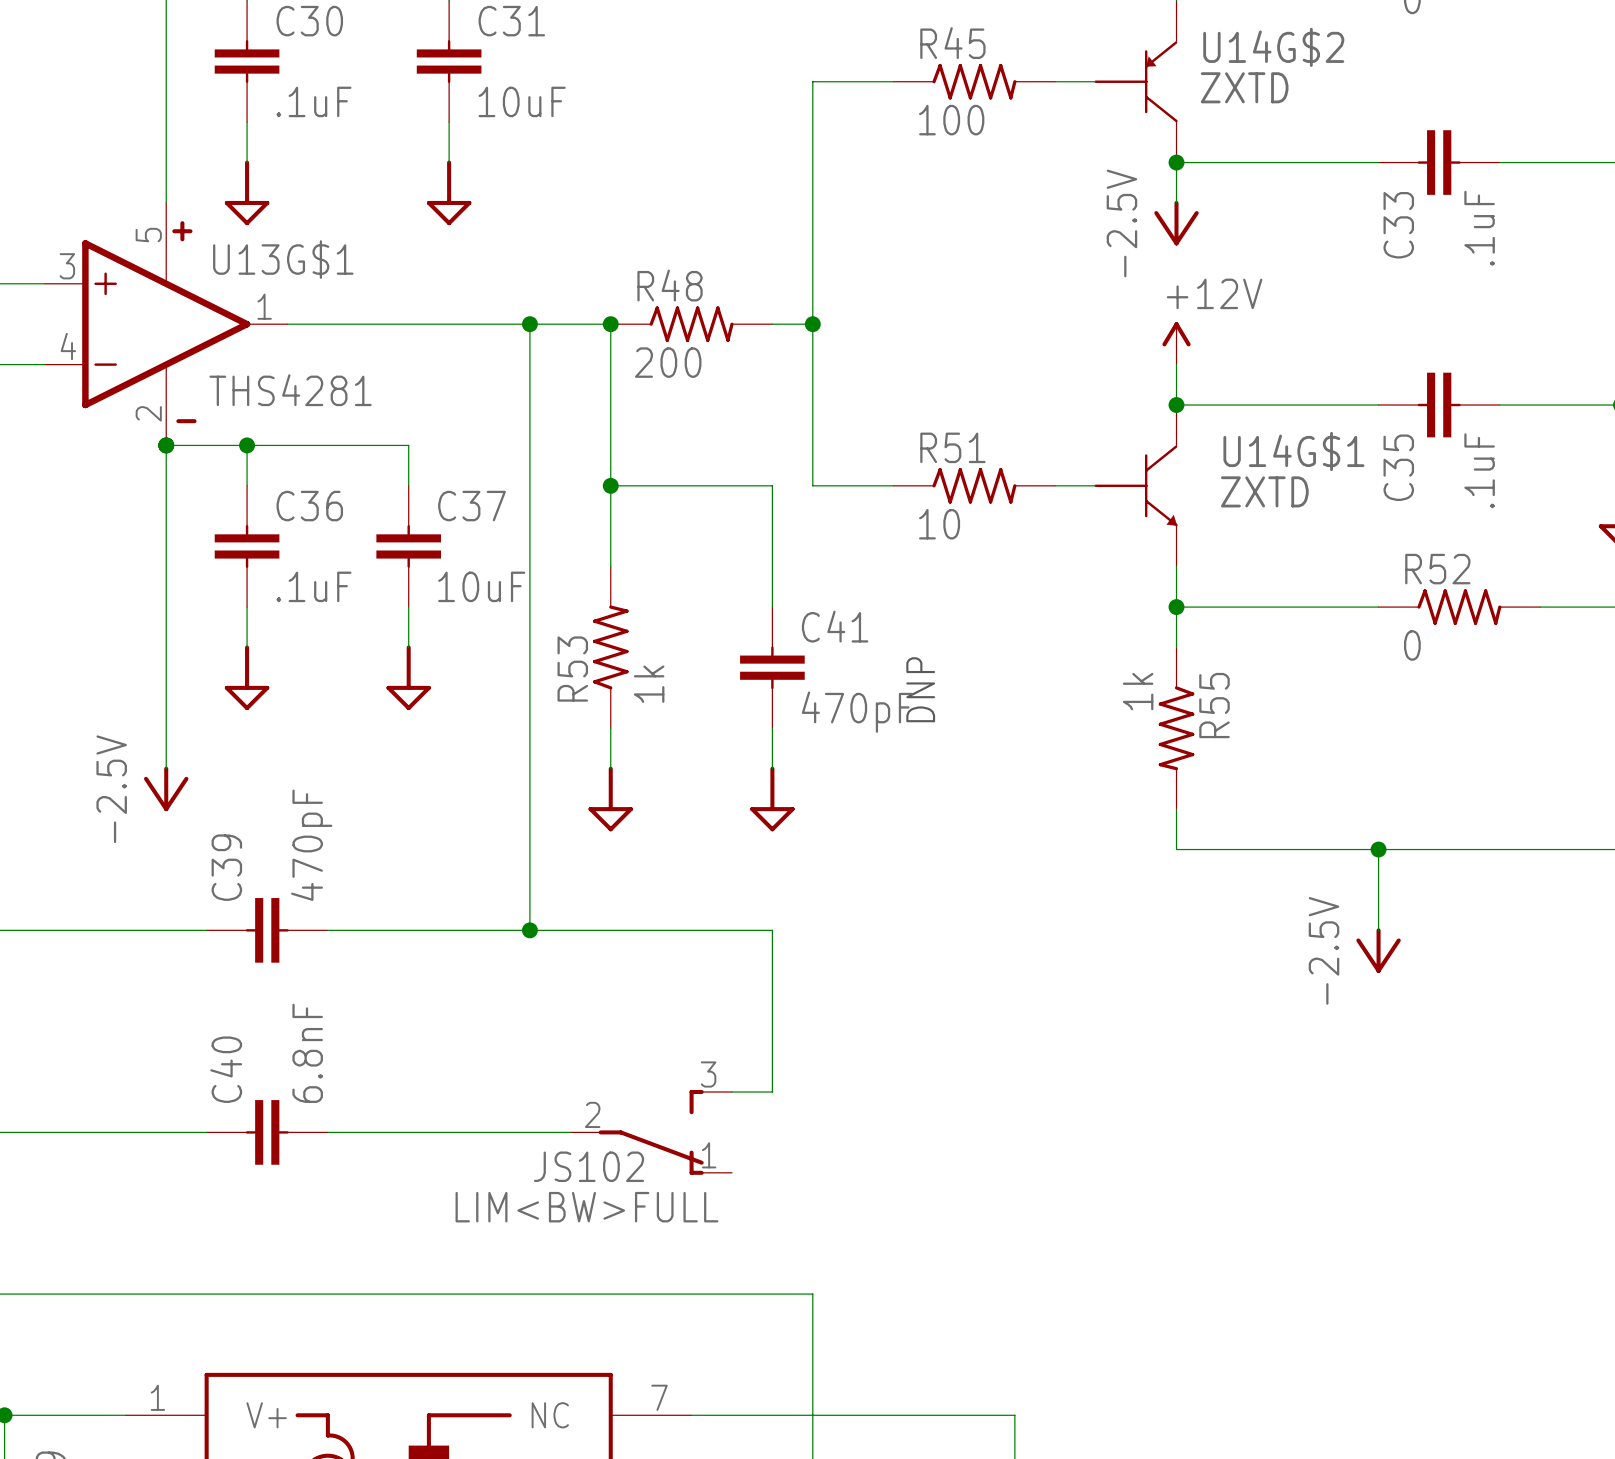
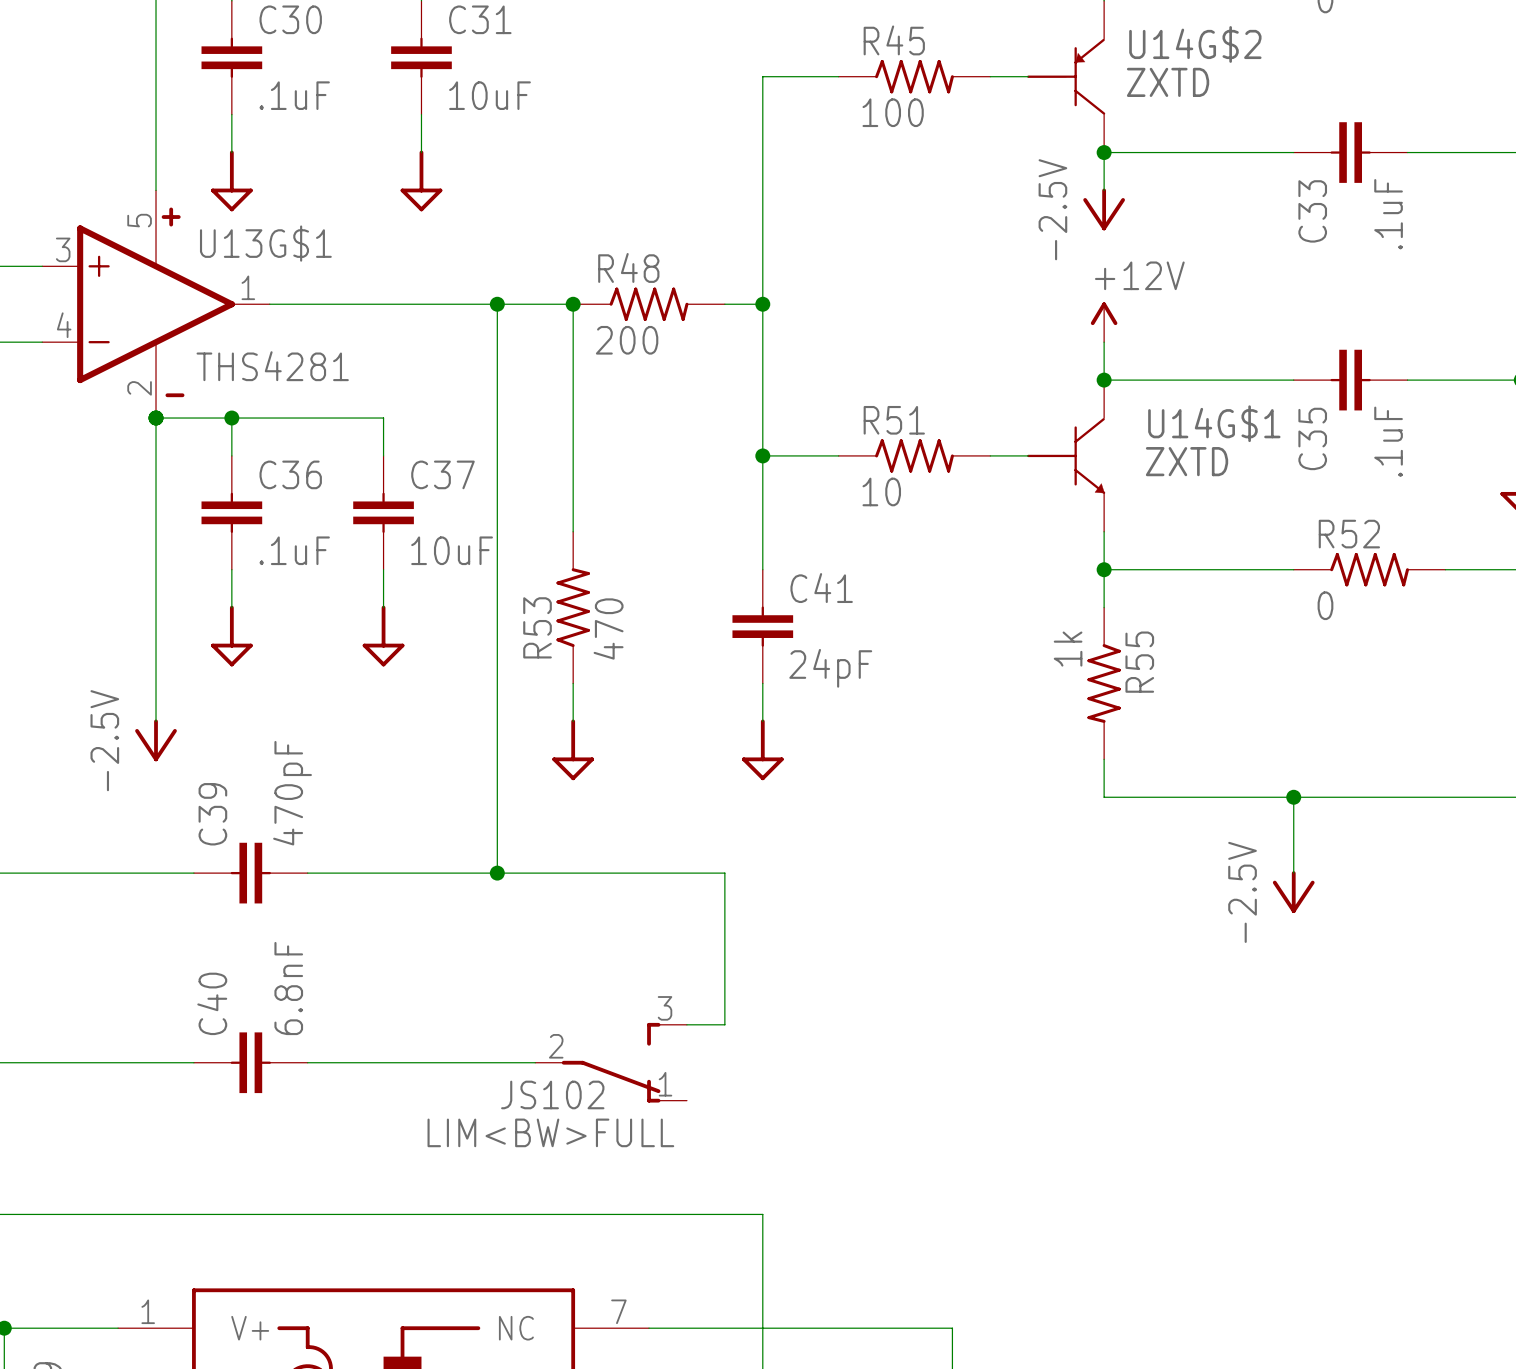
wire: (610, 485) (772, 485) (772, 607) -> none
junction: (610, 485) -> none
wire: none -> (762, 455) (762, 569)
junction: none -> (762, 455)
C41 position: (772, 667) -> (762, 626)
R53 value: 1k (649, 684) -> 470 (608, 629)
text: DNP (920, 689) -> none
C41 value: 470pF (857, 712) -> 24pF (830, 668)
wire: (772, 728) (772, 768) -> (762, 683) (762, 721)
part position: (772, 799) -> (762, 749)

